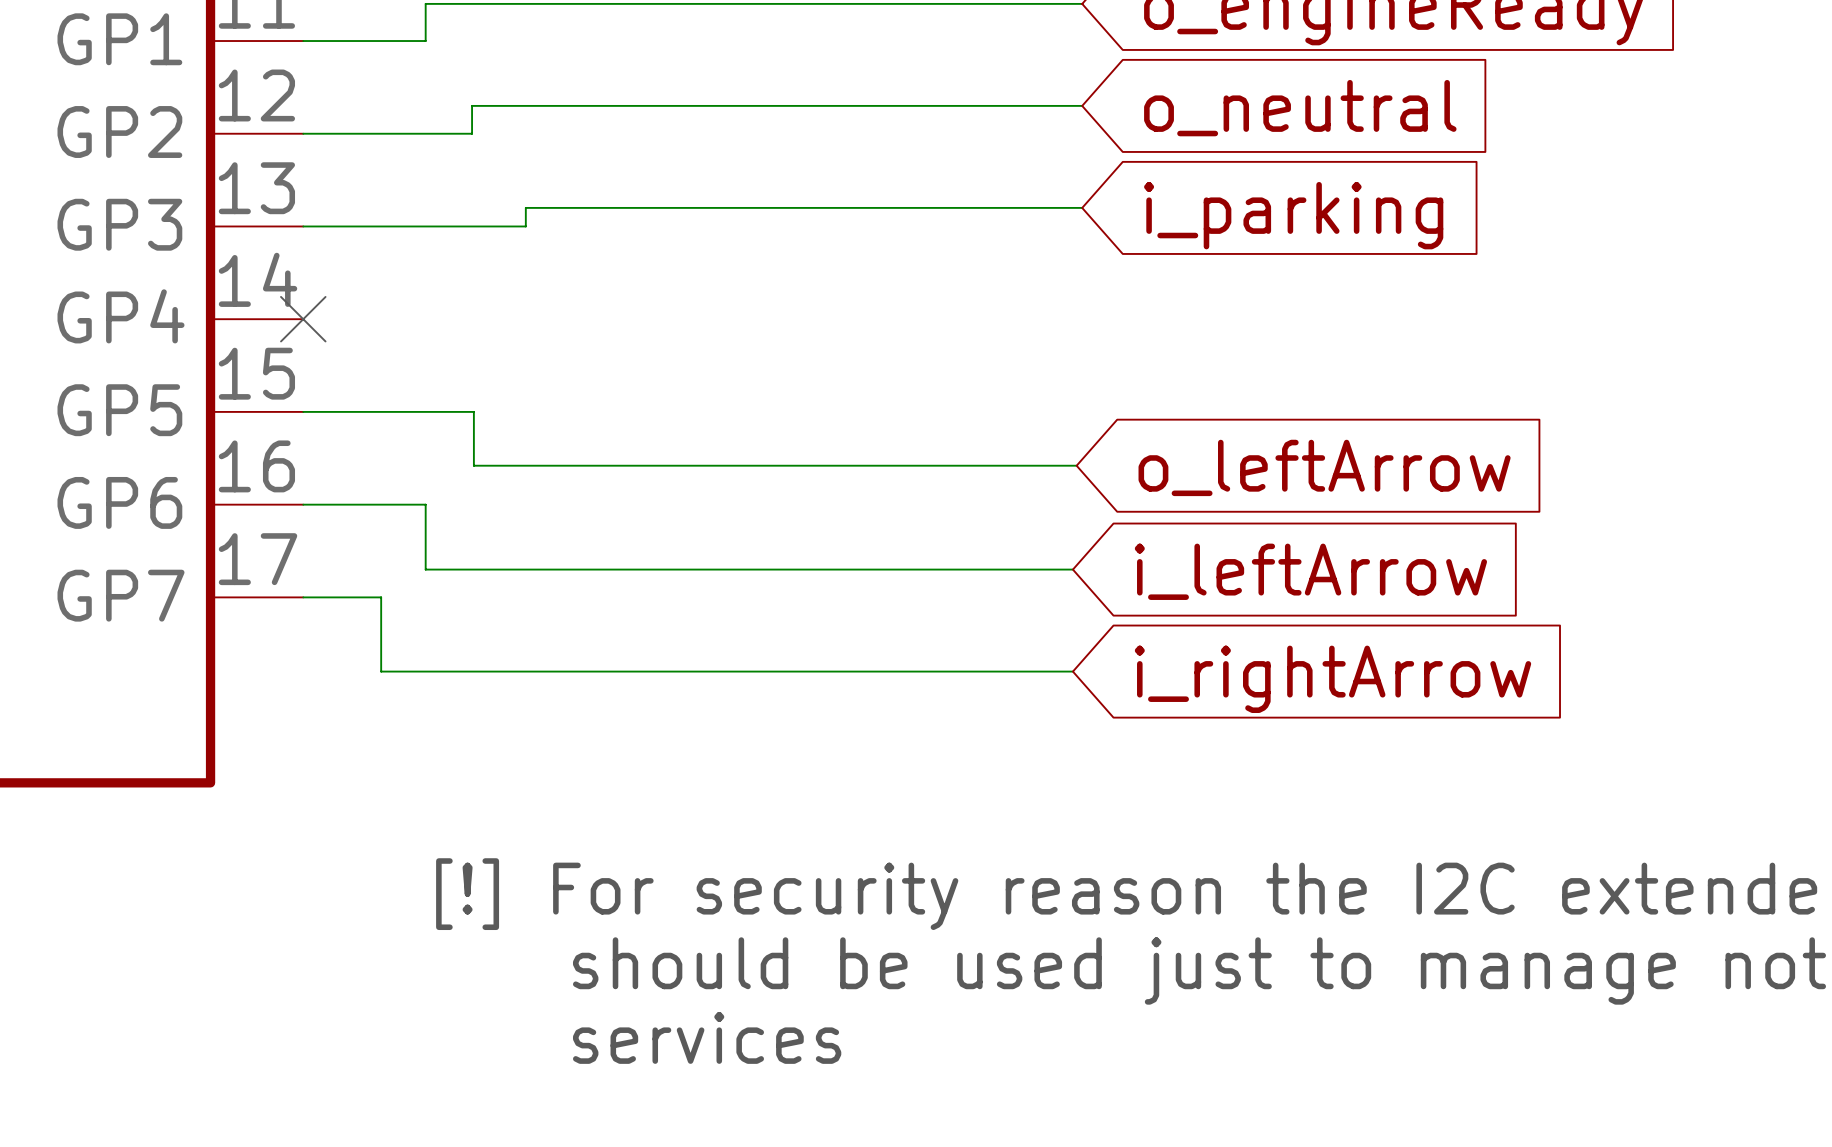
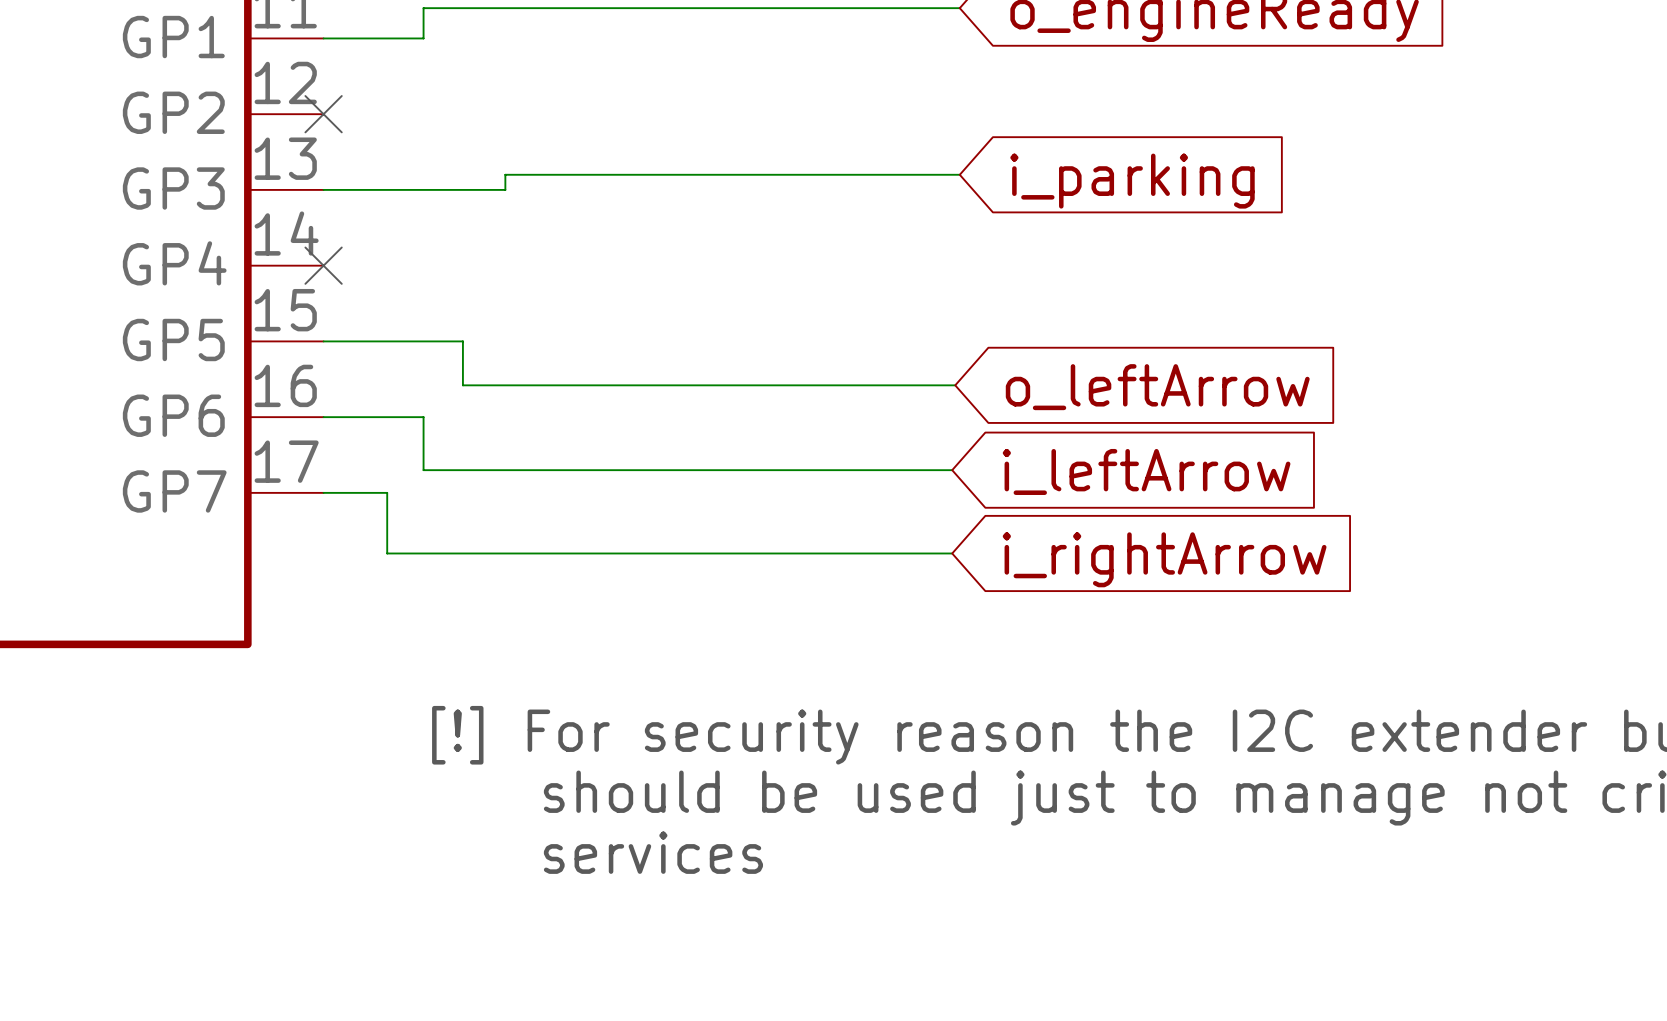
wire: (1082, 105) (472, 105) (472, 133) (303, 133) -> none
global label: o_neutral (1300, 108) -> none
no-connect mark: none -> (323, 114)

